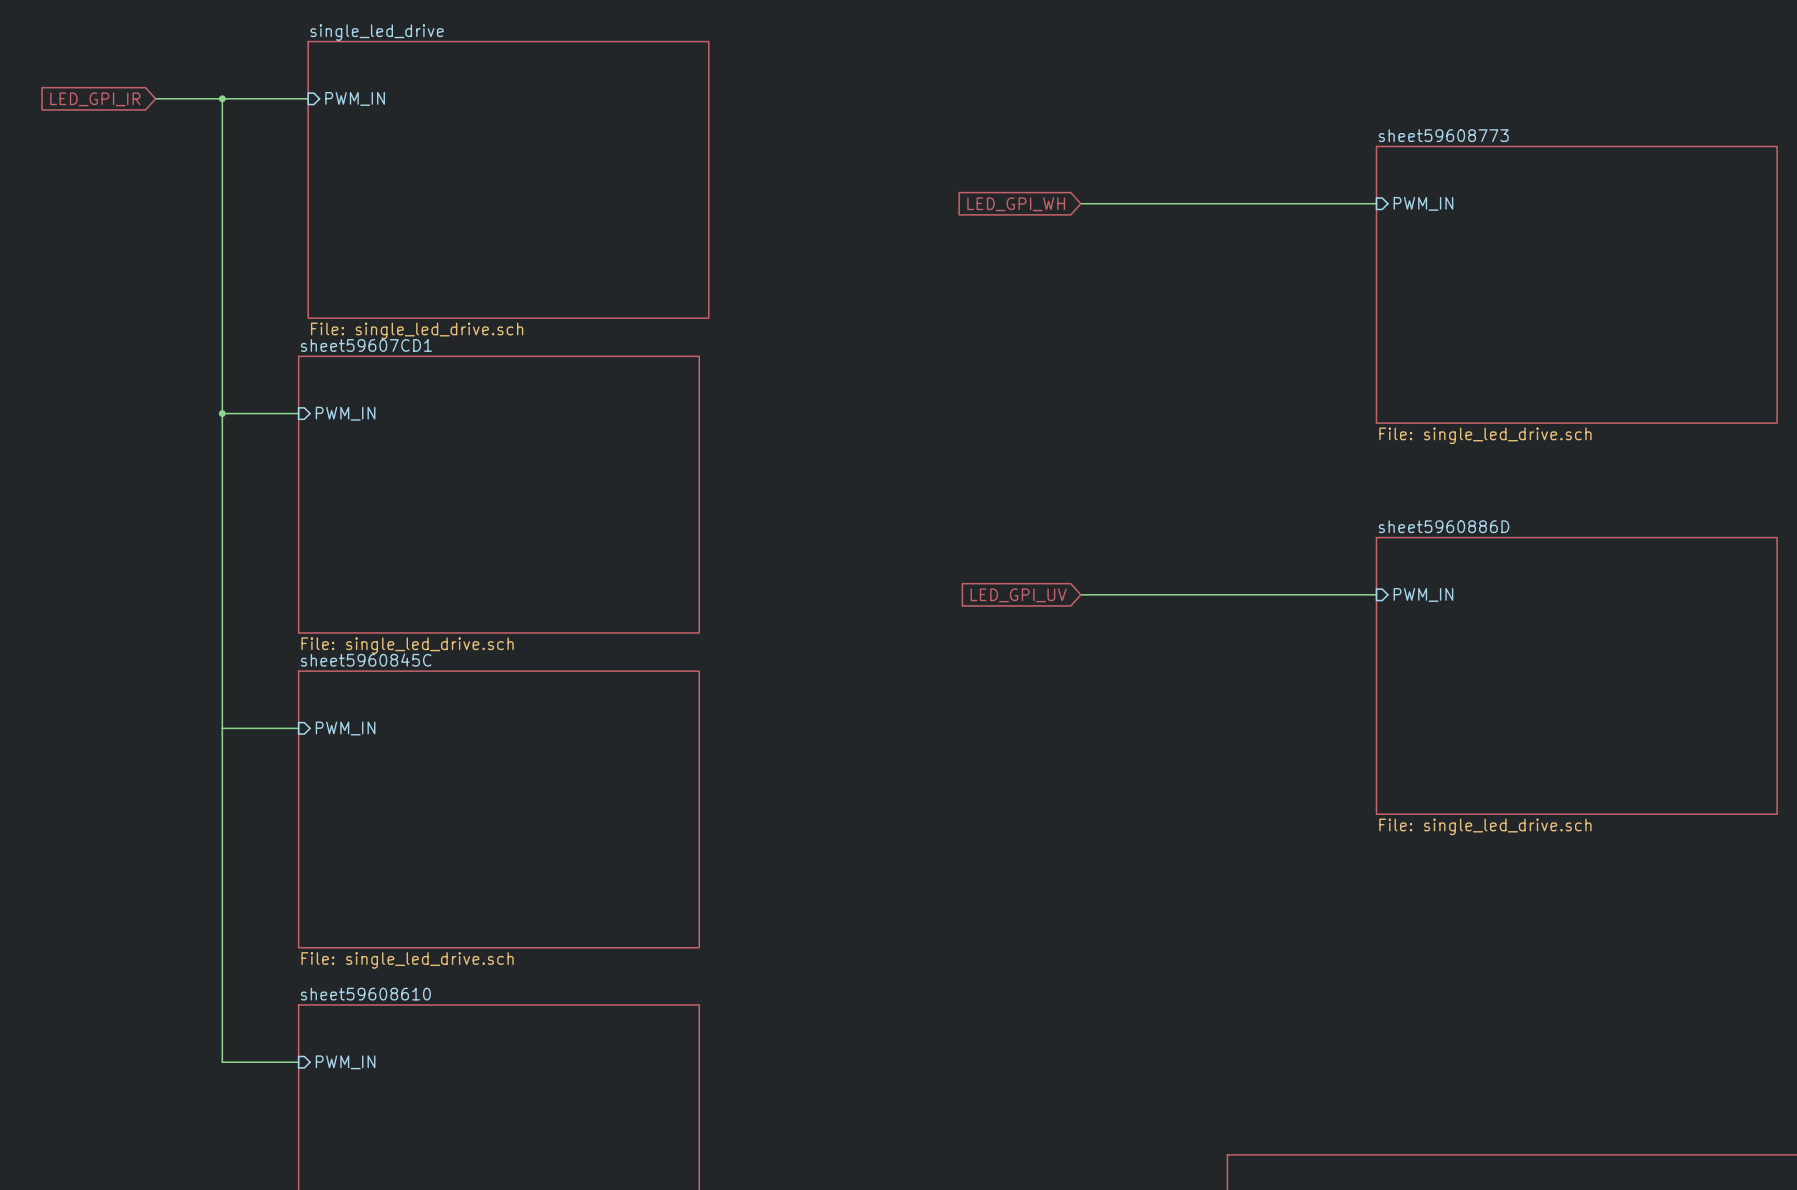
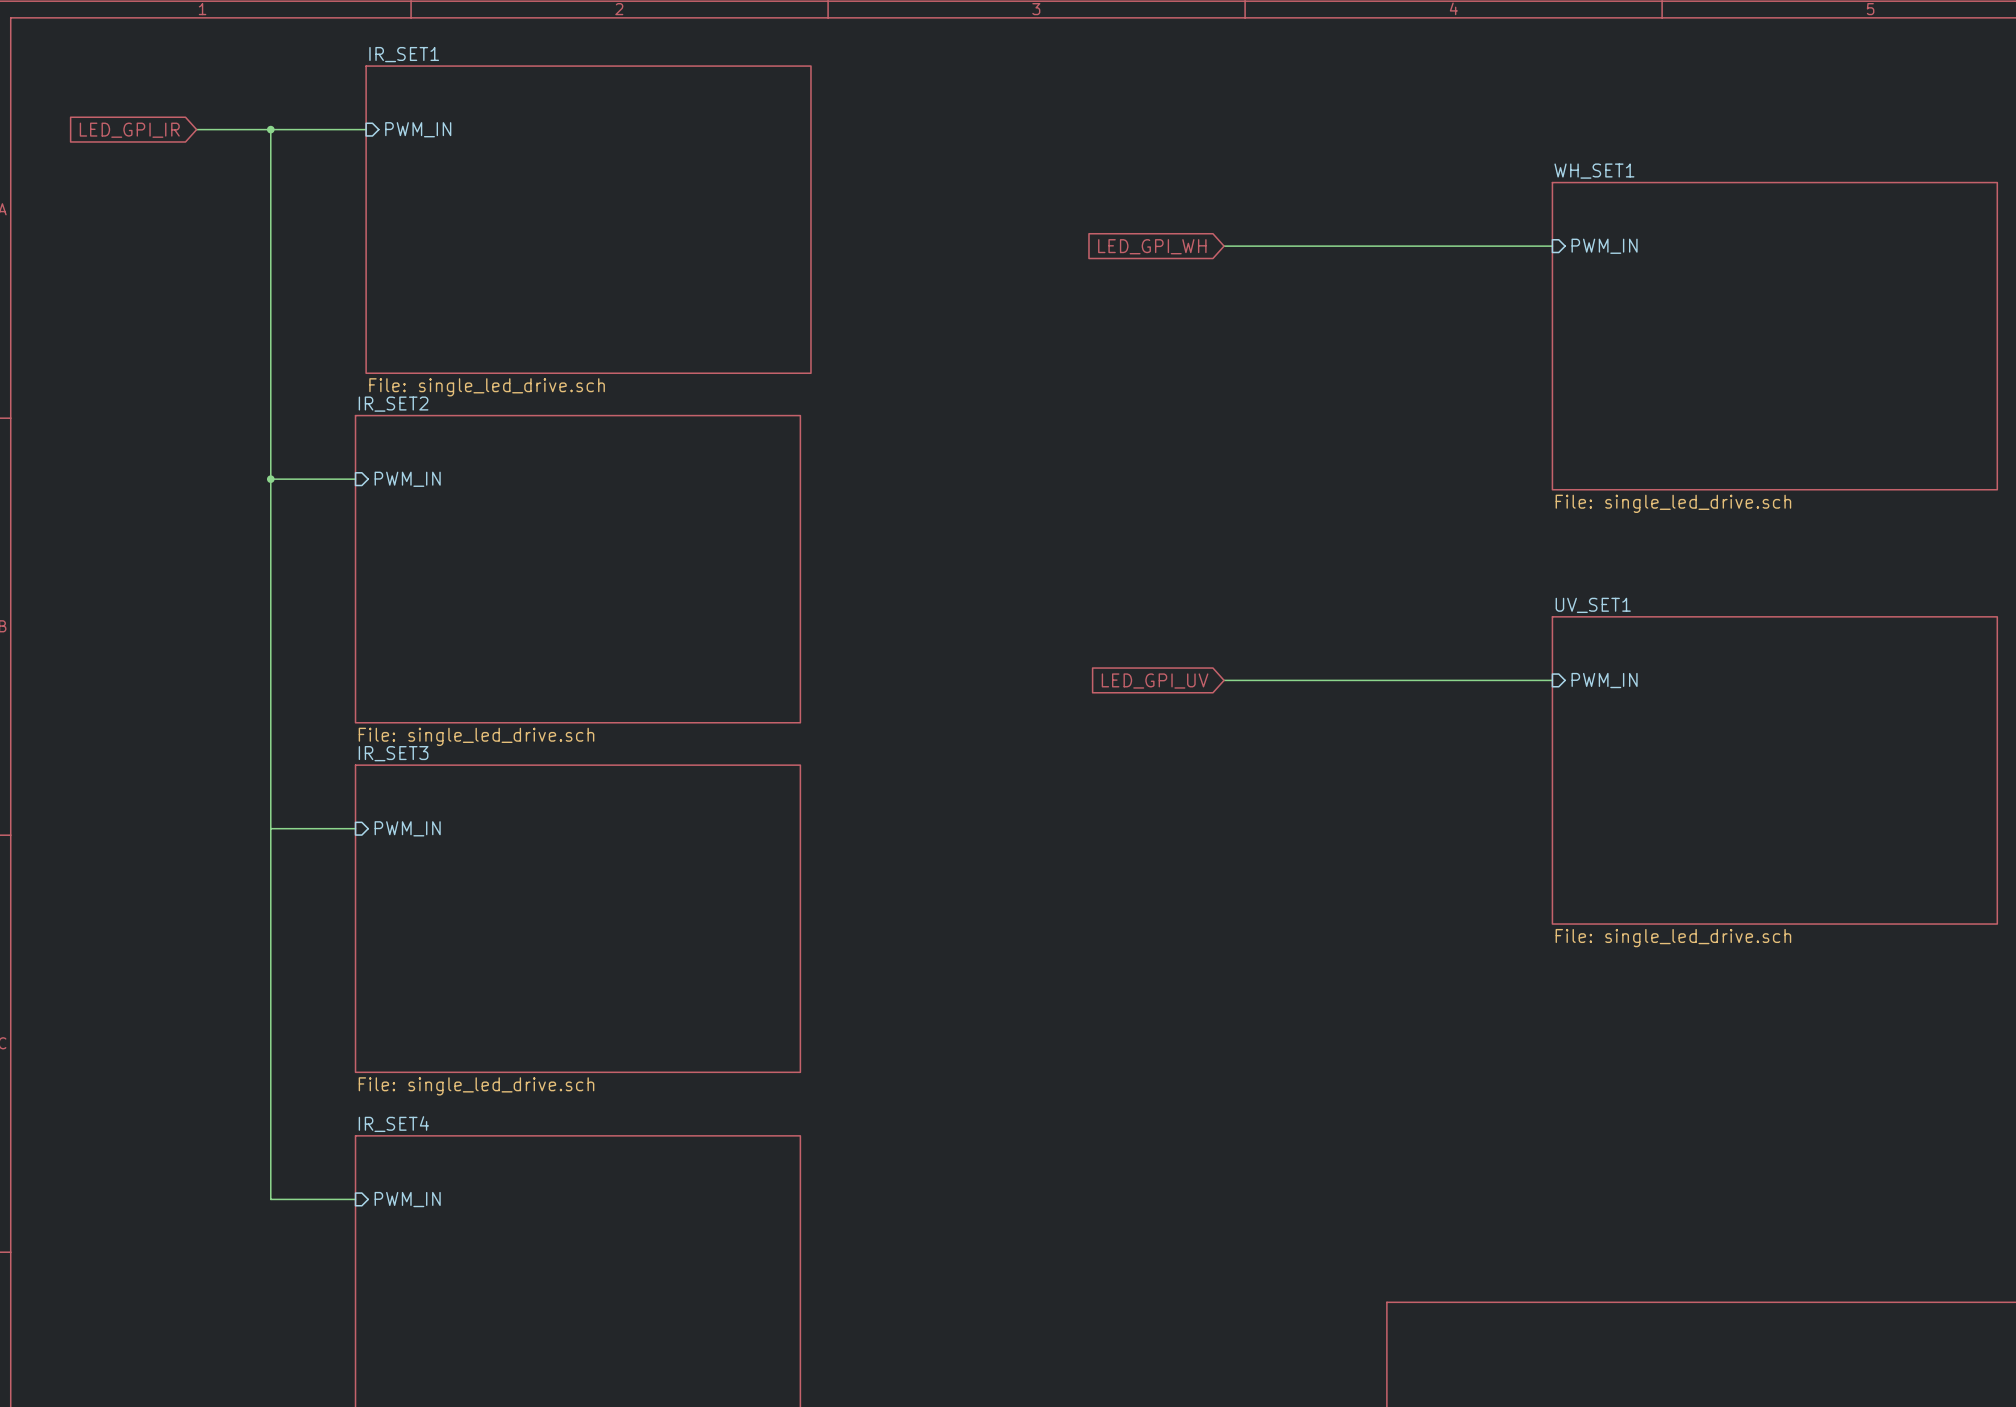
sheet single_led_drive name: single_led_drive (377, 32) -> IR_SET1 (404, 54)
sheet sheet59608773 name: sheet59608773 (1443, 135) -> WH_SET1 (1594, 171)
sheet sheet59607CD1 name: sheet59607CD1 (366, 345) -> IR_SET2 (393, 404)
sheet sheet5960886D name: sheet5960886D (1444, 526) -> UV_SET1 (1593, 605)
sheet sheet5960845C name: sheet5960845C (366, 659) -> IR_SET3 (393, 753)
sheet sheet59608610 name: sheet59608610 (365, 994) -> IR_SET4 (393, 1124)

